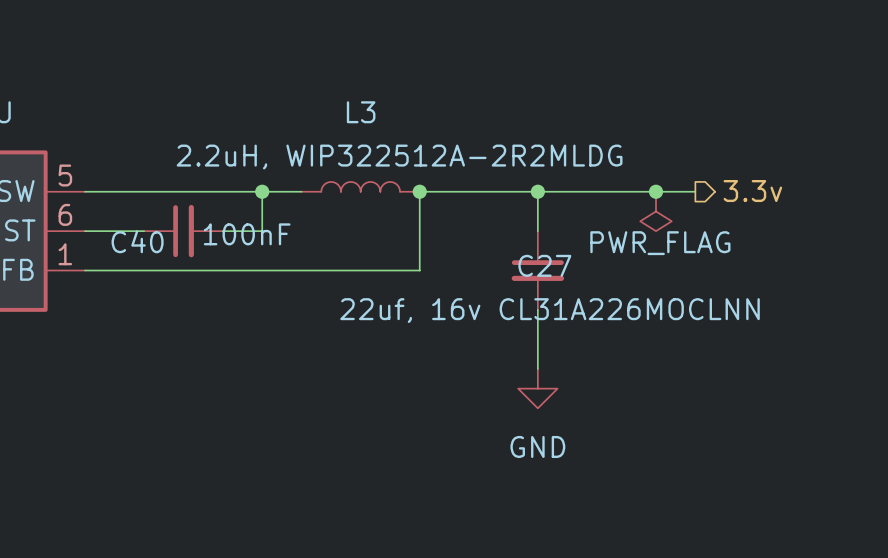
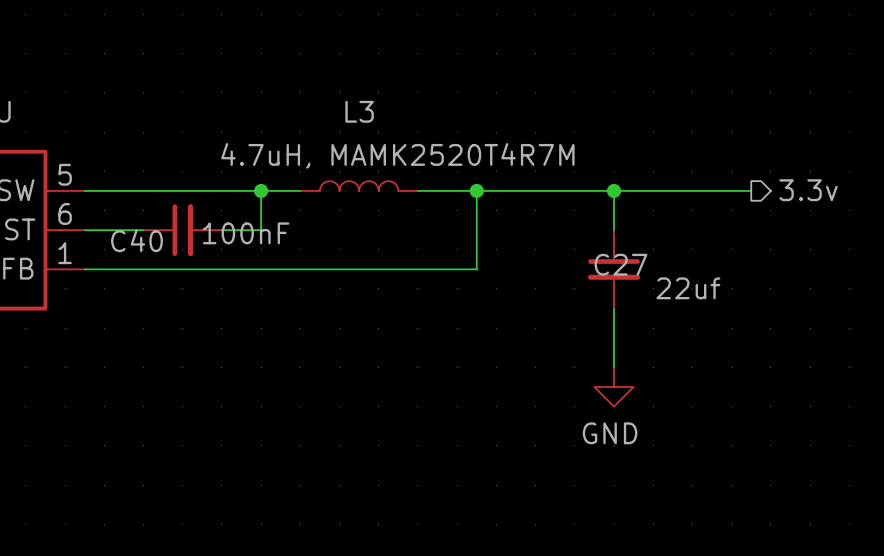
L3 value: 2.2uH, WIP322512A-2R2MLDG (399, 156) -> 4.7uH, MAMK2520T4R7M (397, 155)
wire: (419, 191) (419, 270) -> (476, 190) (476, 269) (417, 269)
junction: (419, 191) -> none
junction: none -> (476, 190)
wire: (537, 191) (537, 231) -> (614, 190) (614, 230)
junction: (537, 191) -> none
junction: none -> (614, 190)
junction: (655, 191) -> none
wire: none -> (692, 190) (751, 190)
hierarchical label position: 3.3v (752, 191) -> 3.3v (808, 190)
power symbol: PWR_FLAG (655, 211) -> none
C27 position: (537, 270) -> (614, 269)
wire: (537, 309) (537, 368) -> (614, 308) (614, 367)
C27 value: 22uf, 16v CL31A226MOCLNN (550, 310) -> 22uf (688, 288)
power symbol position: GND (537, 388) -> GND (614, 386)
power symbol text position: GND (537, 446) -> GND (610, 433)

